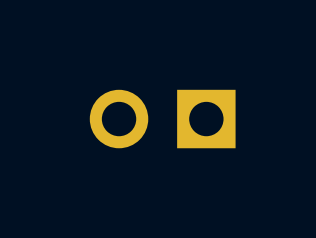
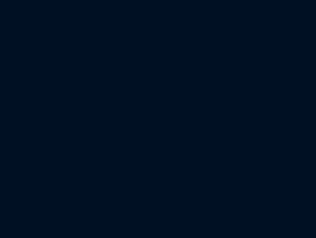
part: (162, 119) -> none

